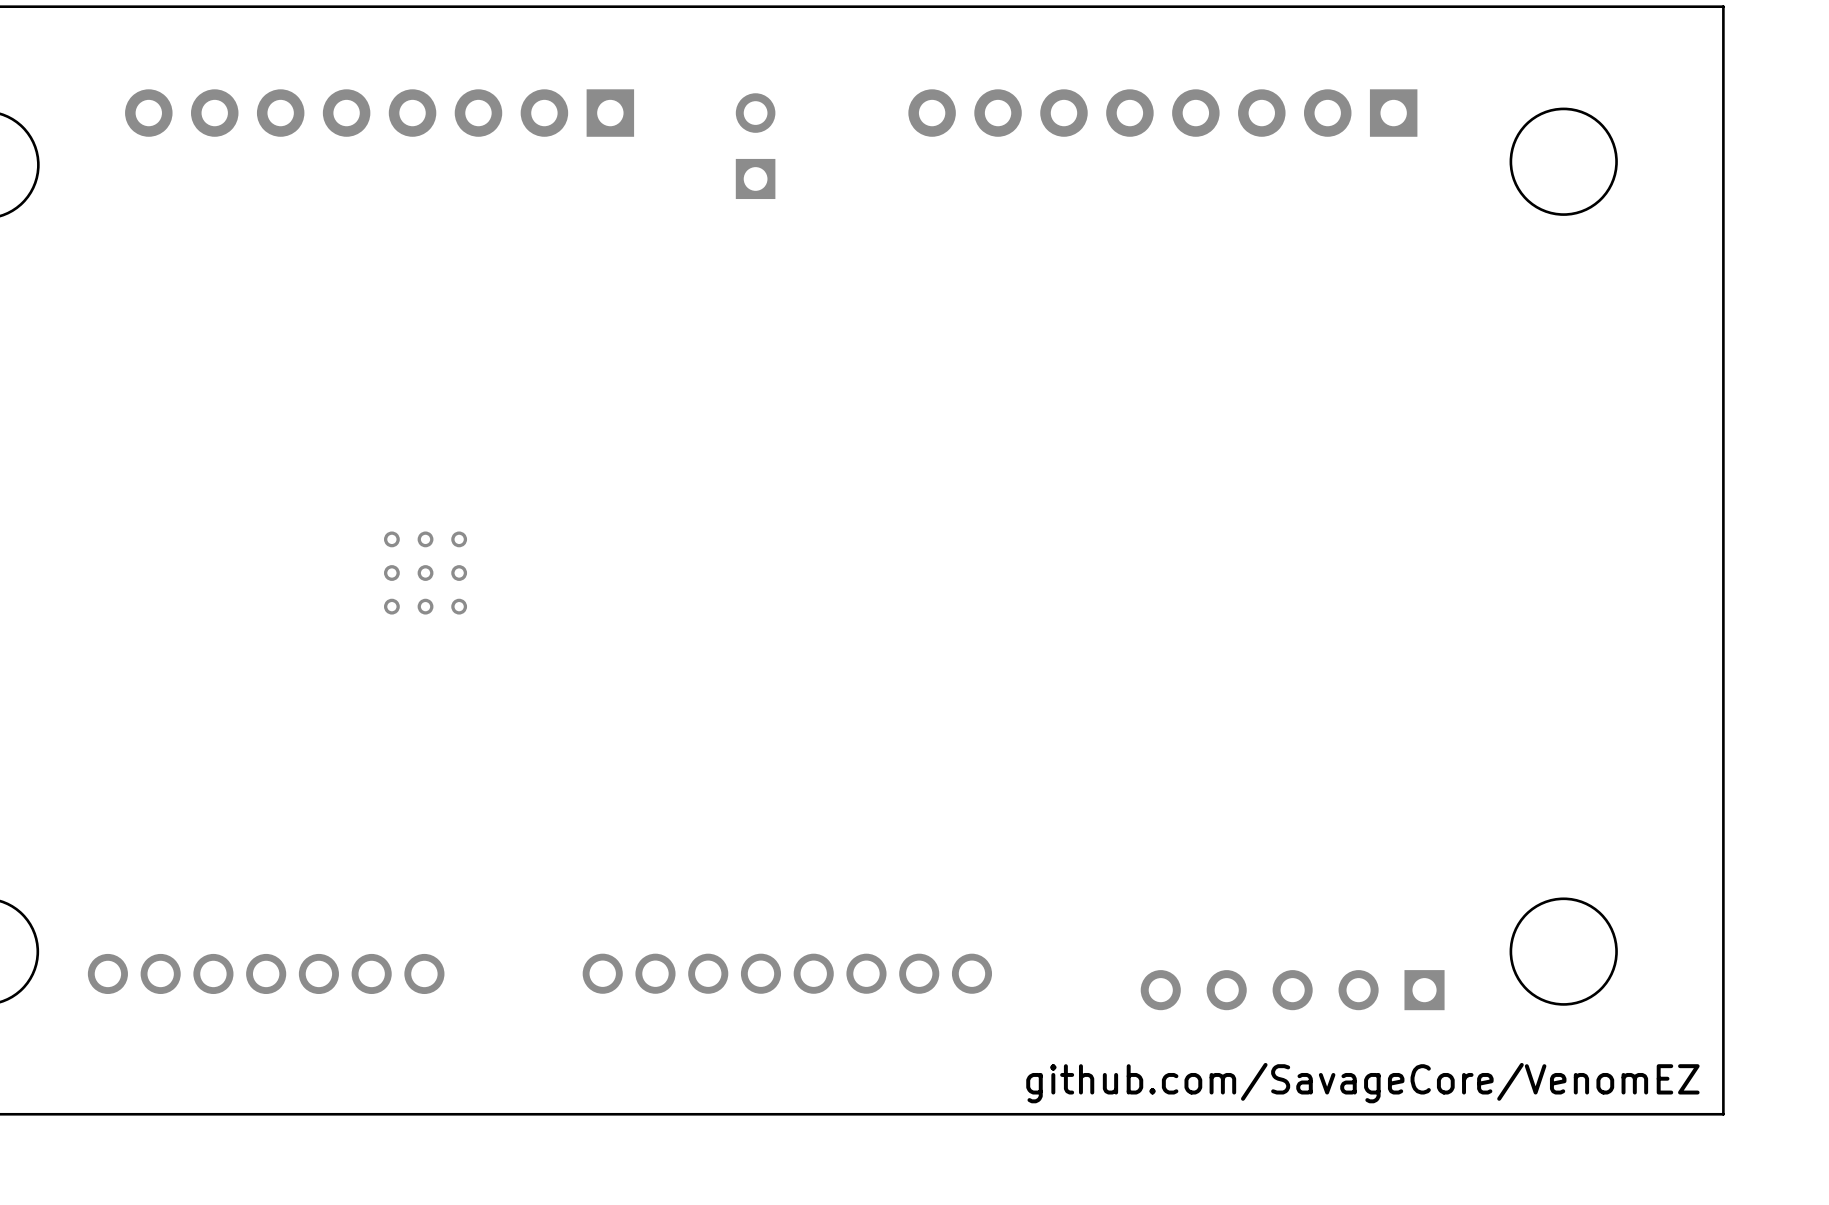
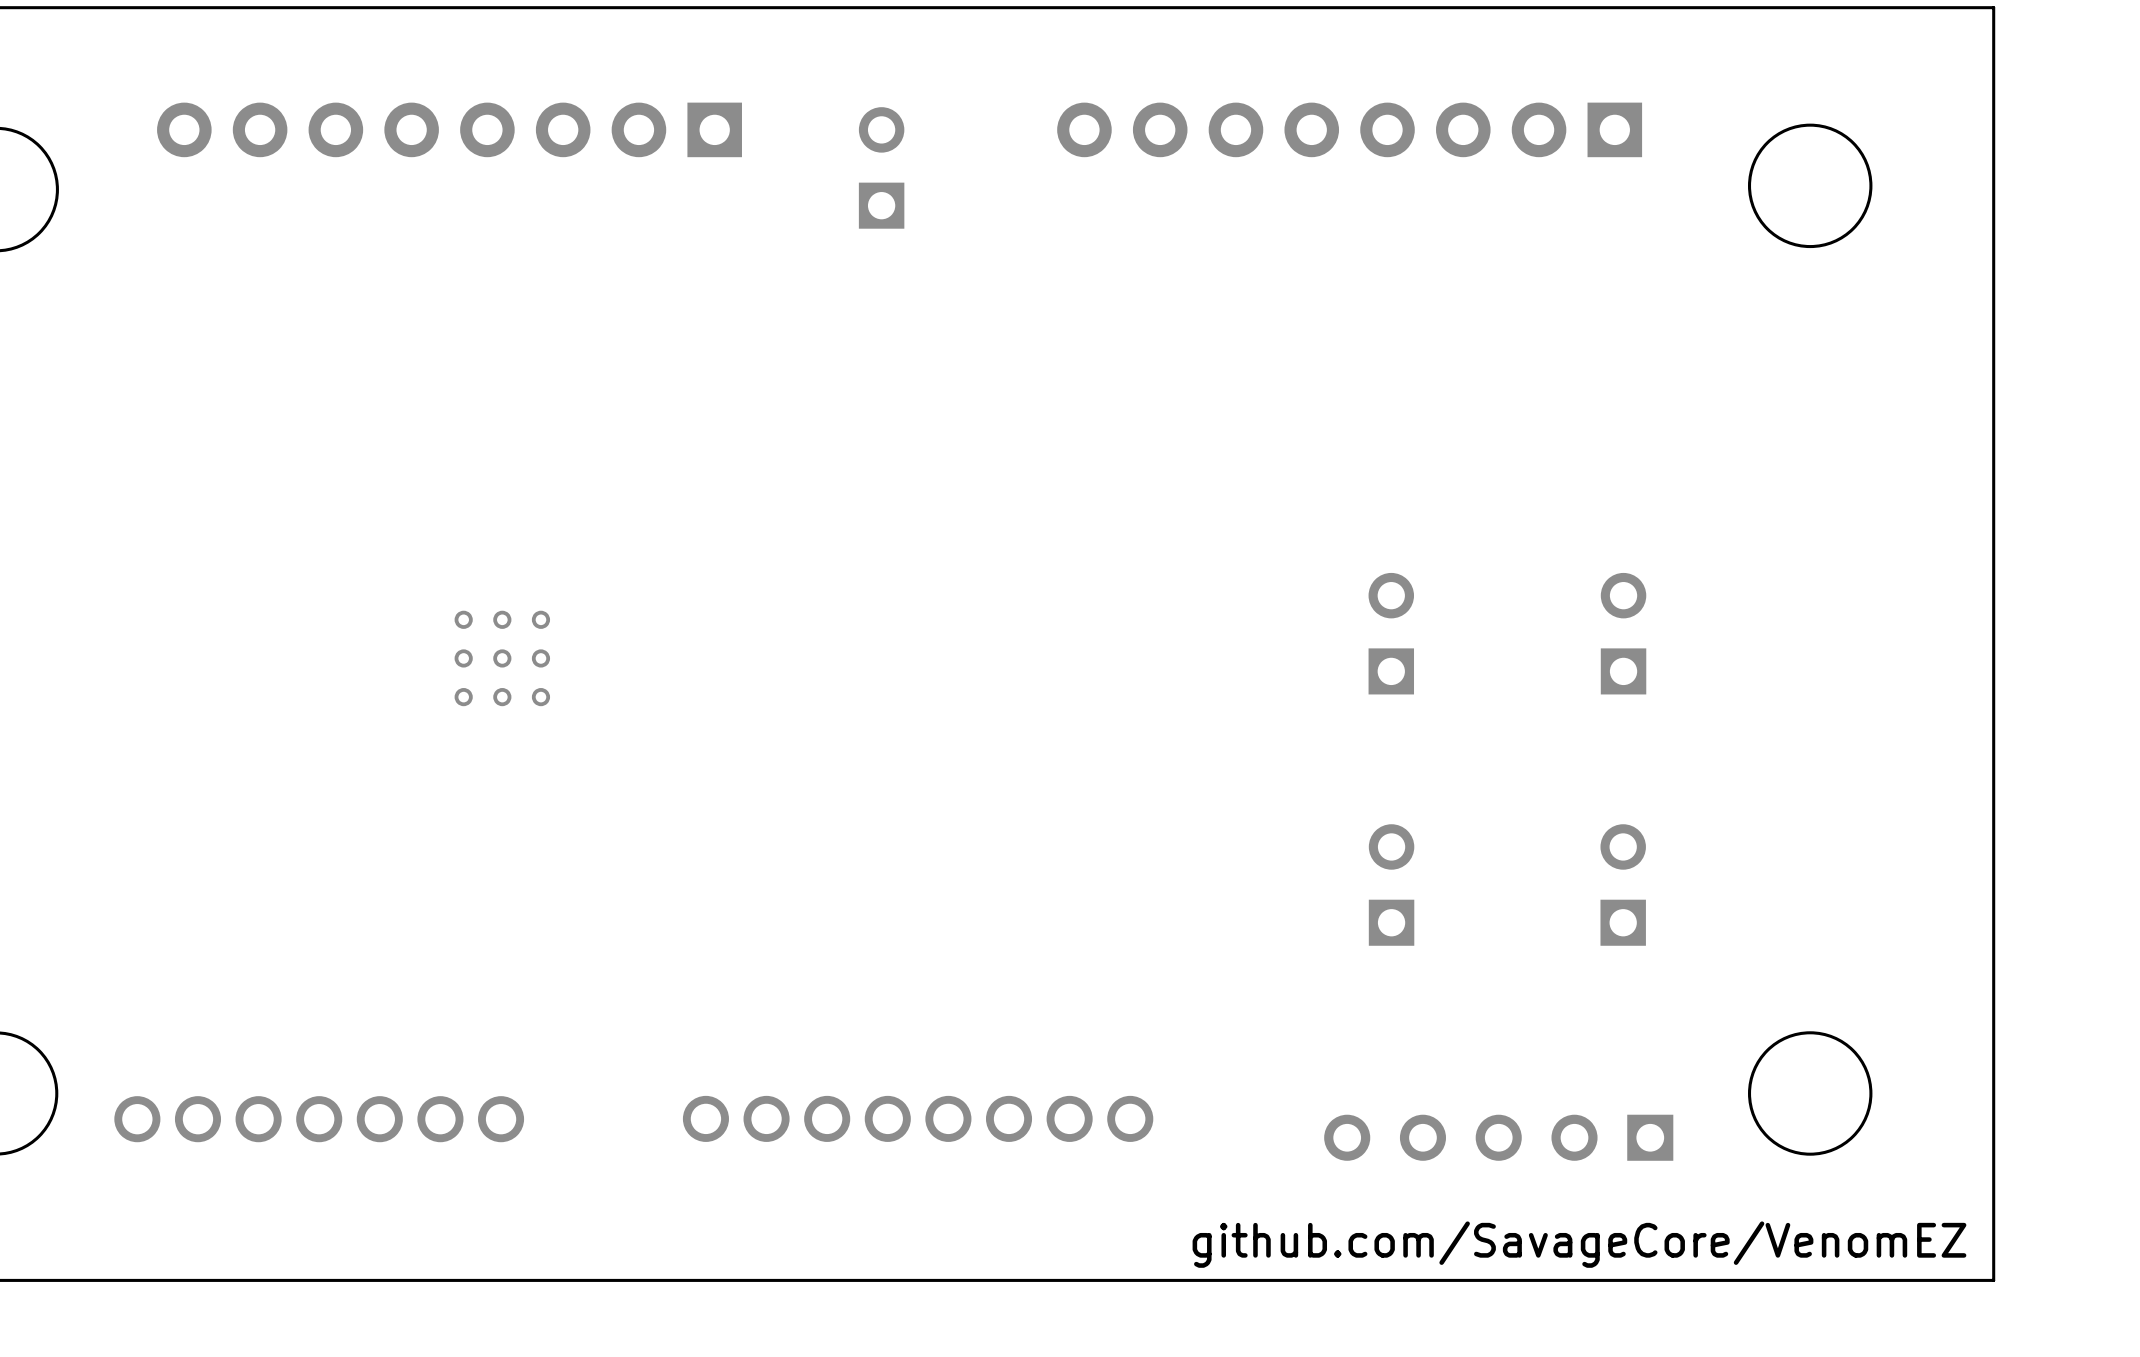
part: none -> (1391, 633)
part: none -> (1623, 633)
part: none -> (1391, 885)
part: none -> (1623, 885)

